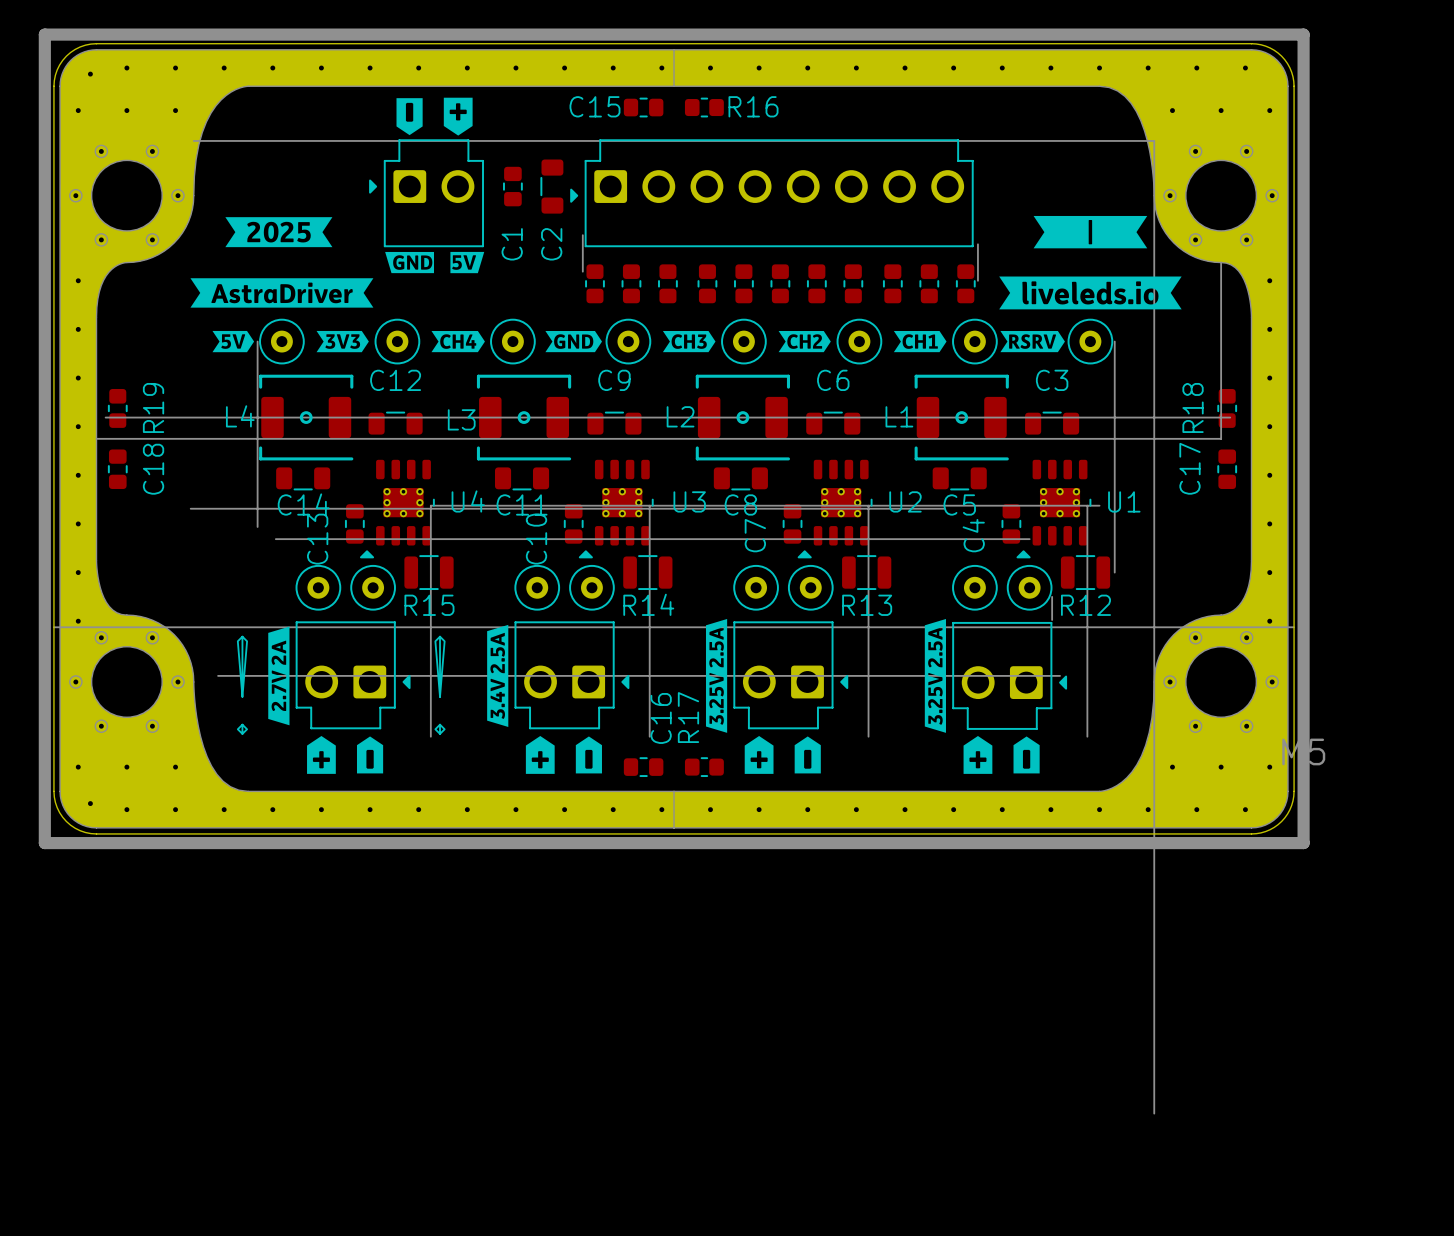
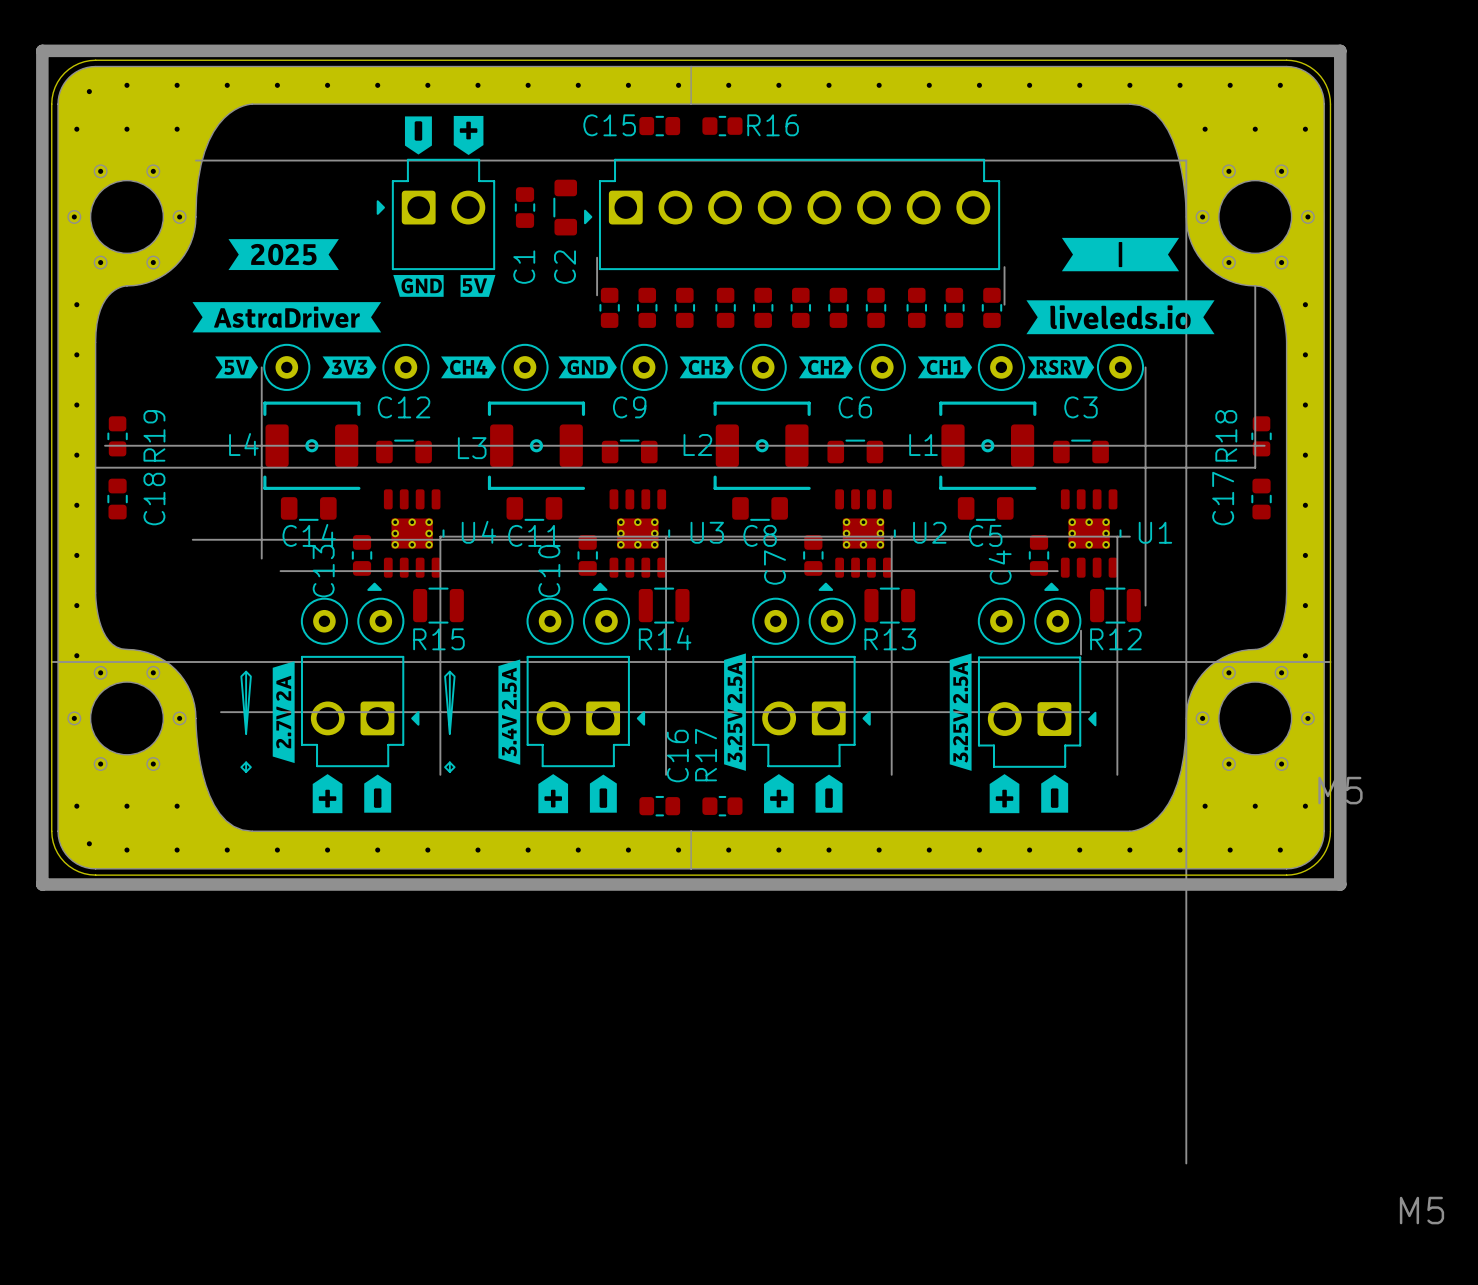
text: none -> M5 (1421, 1210)

